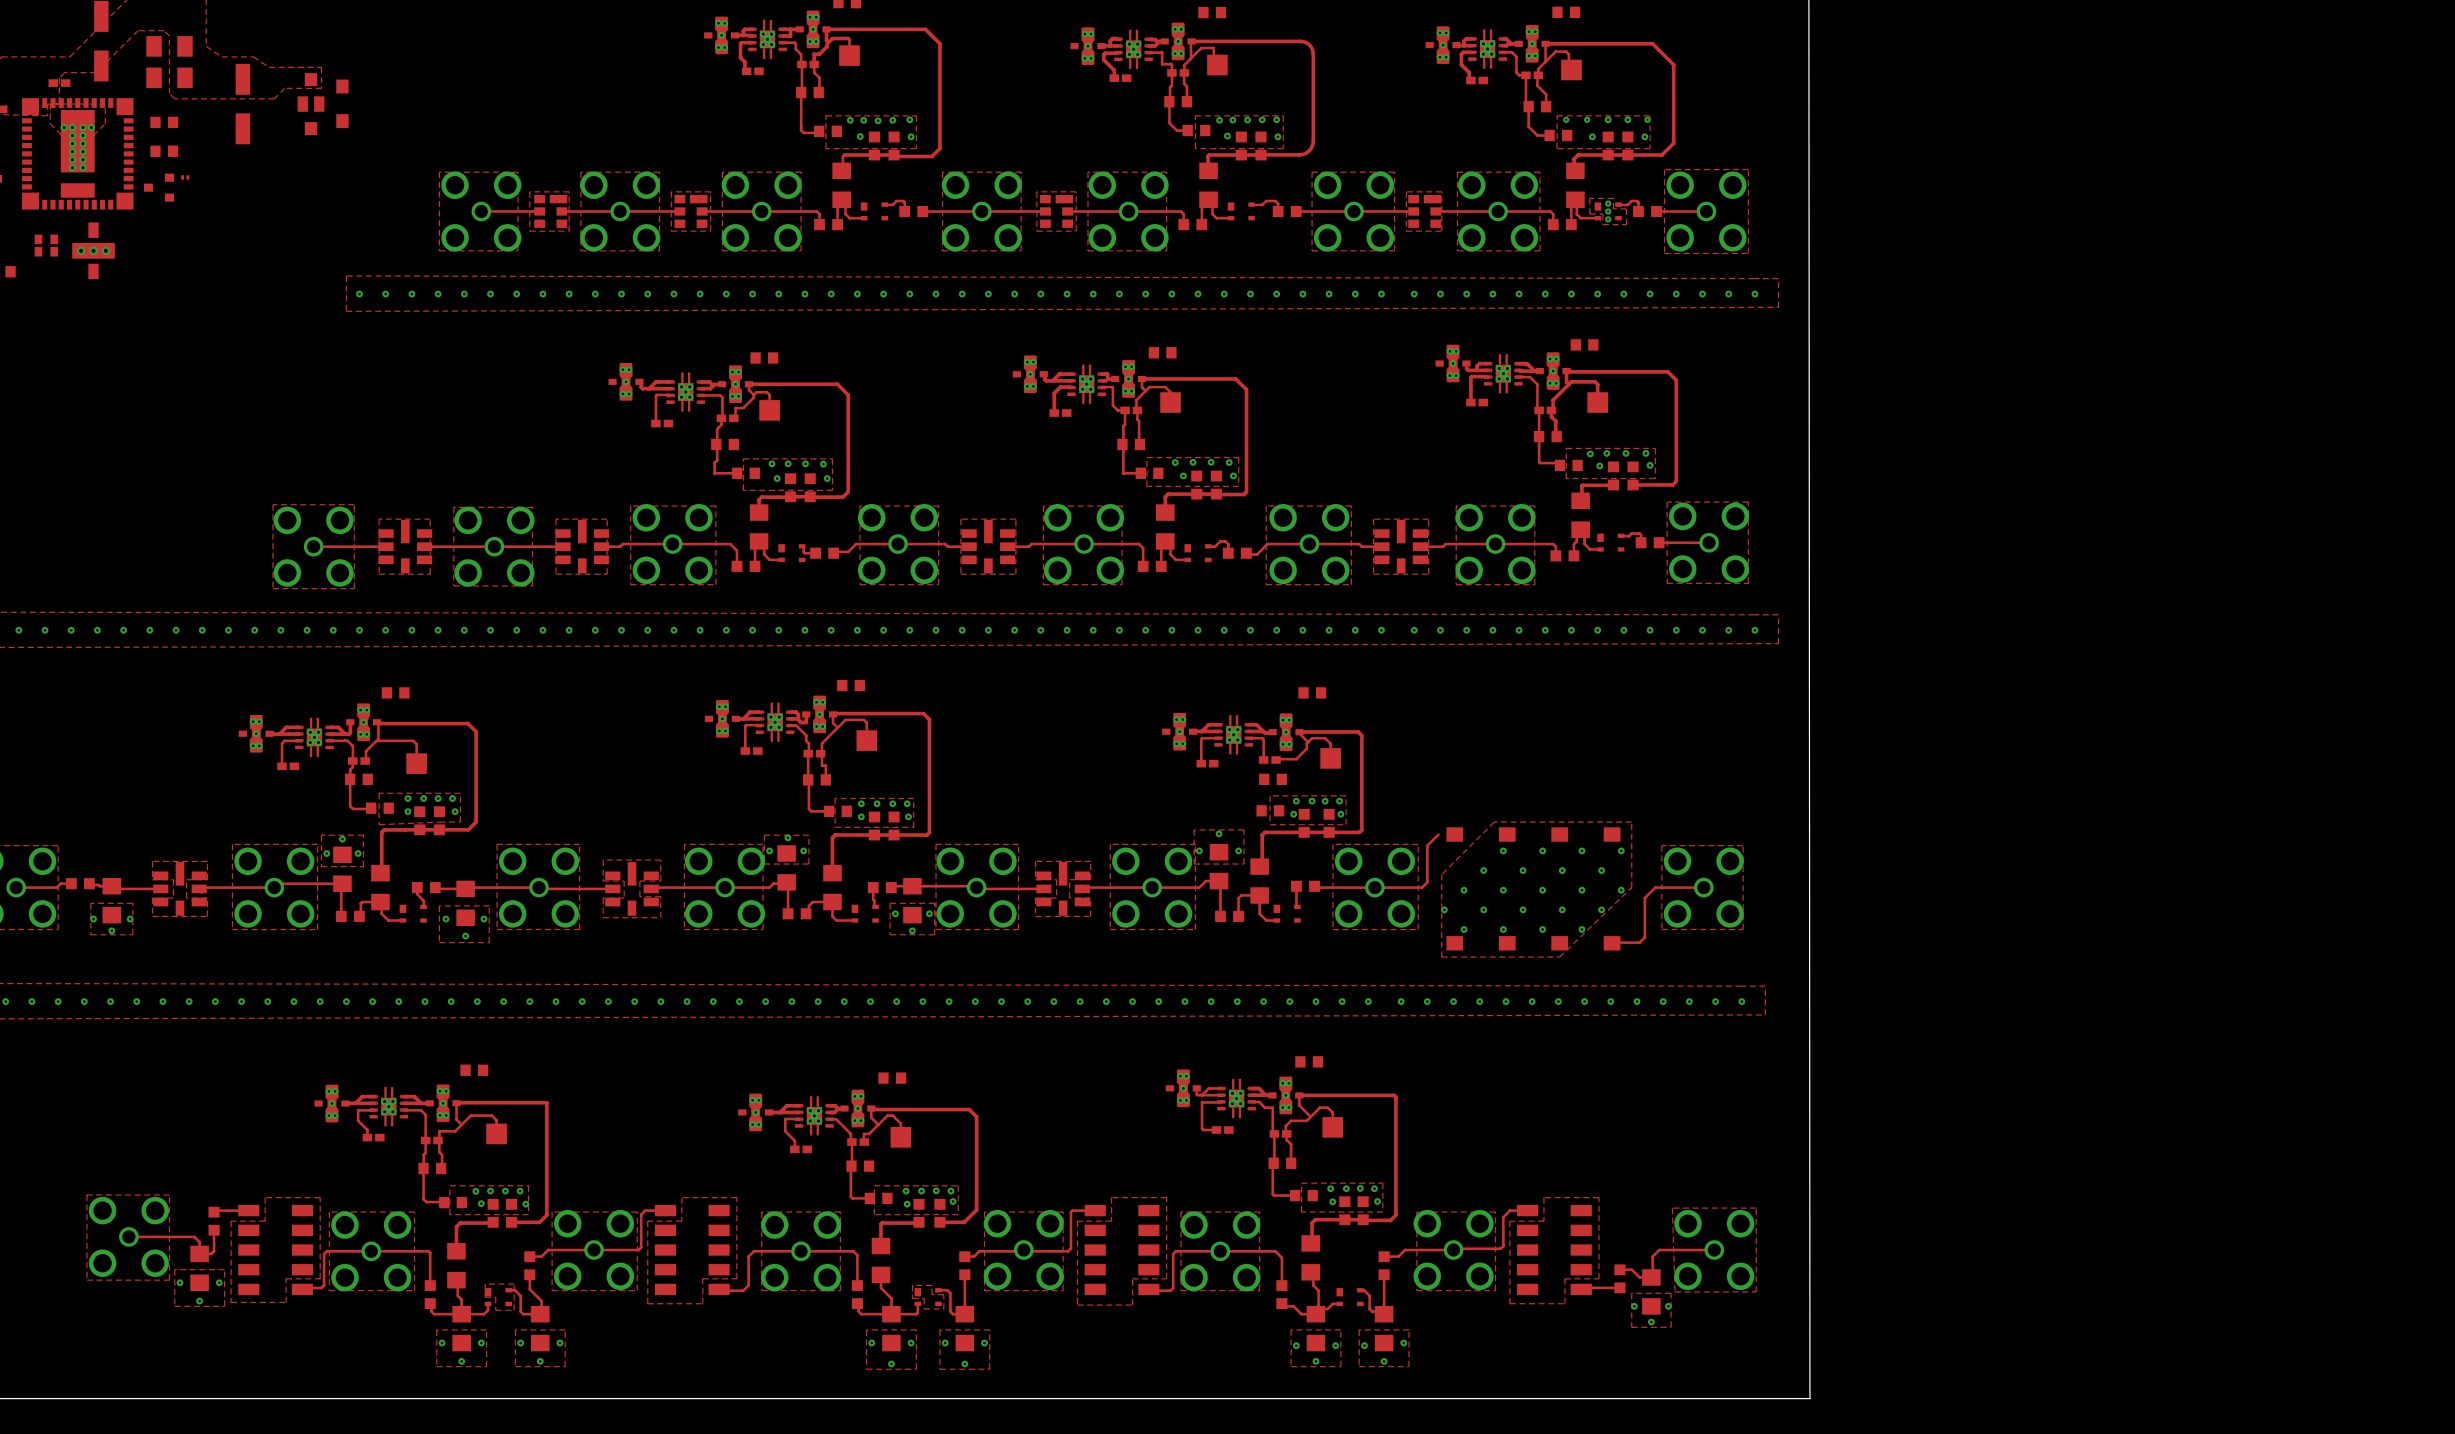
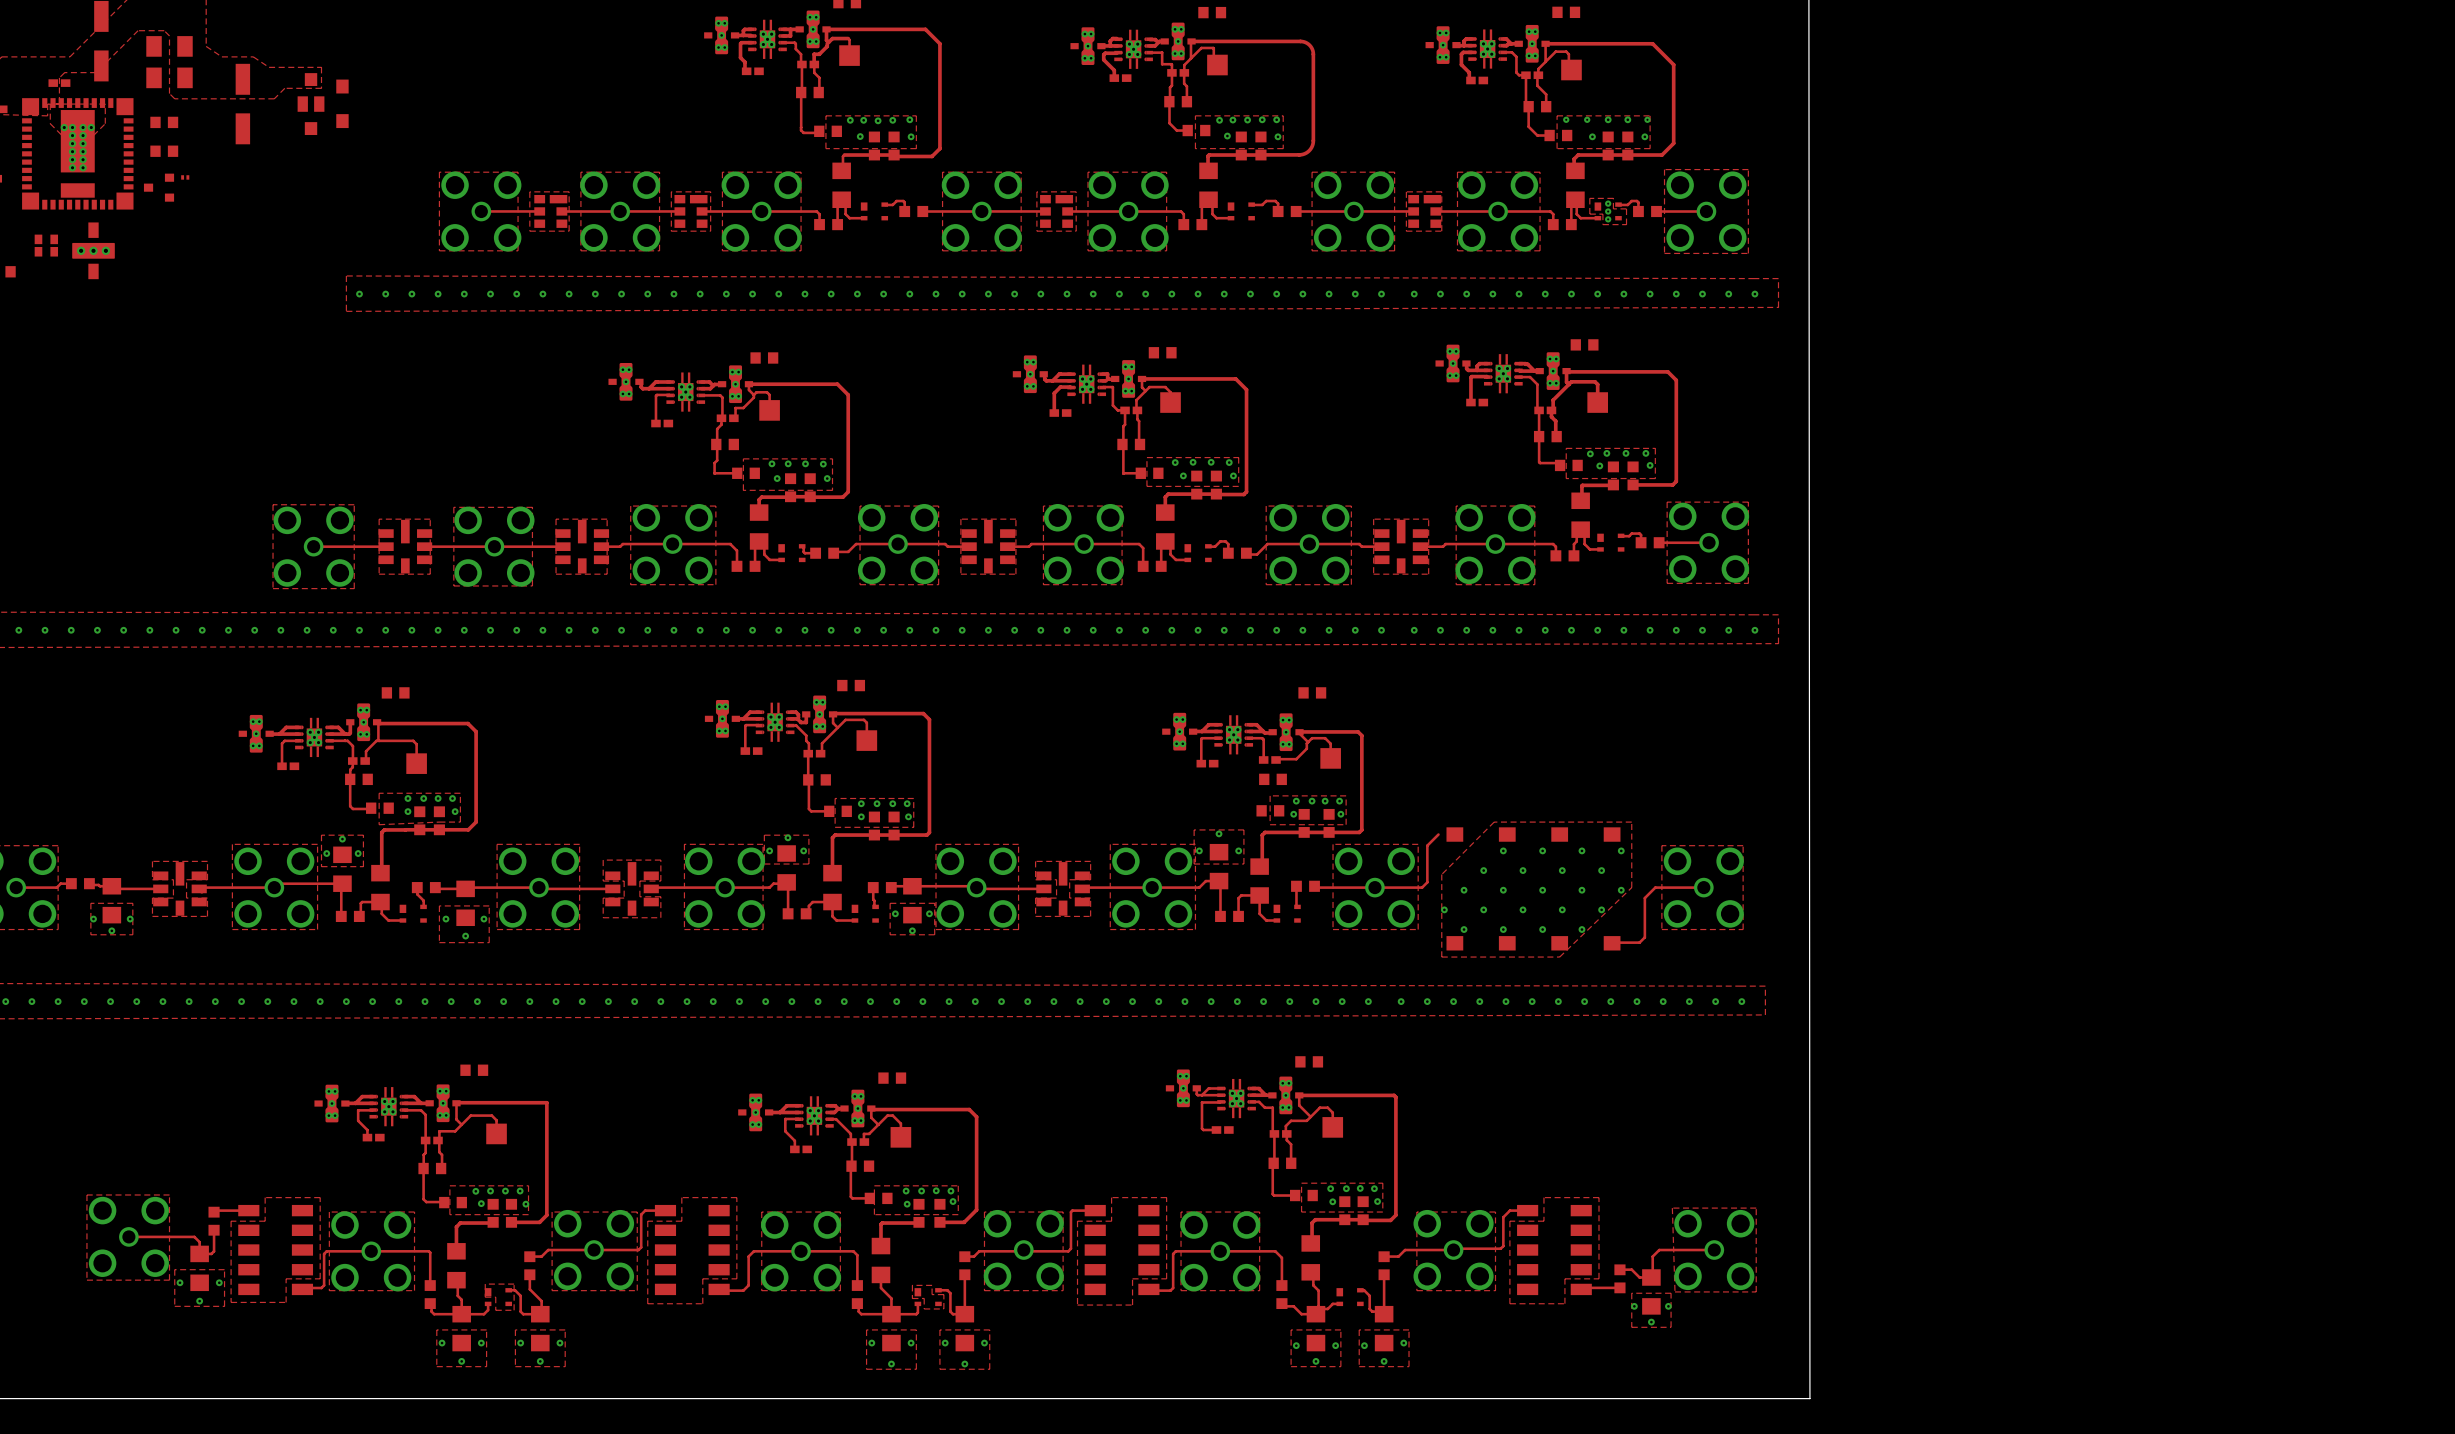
top track: (820, 753) (822, 765) (825, 765) -> none
top track: (825, 765) (825, 779) -> none

